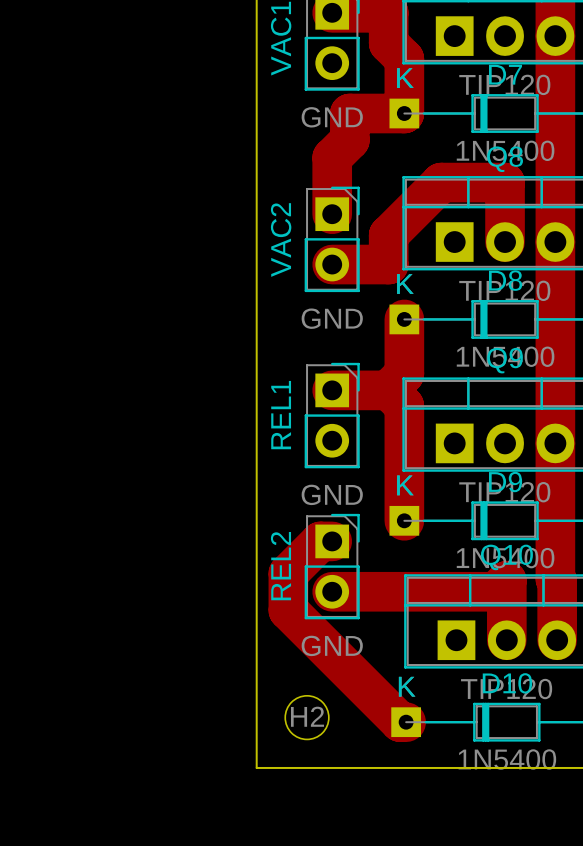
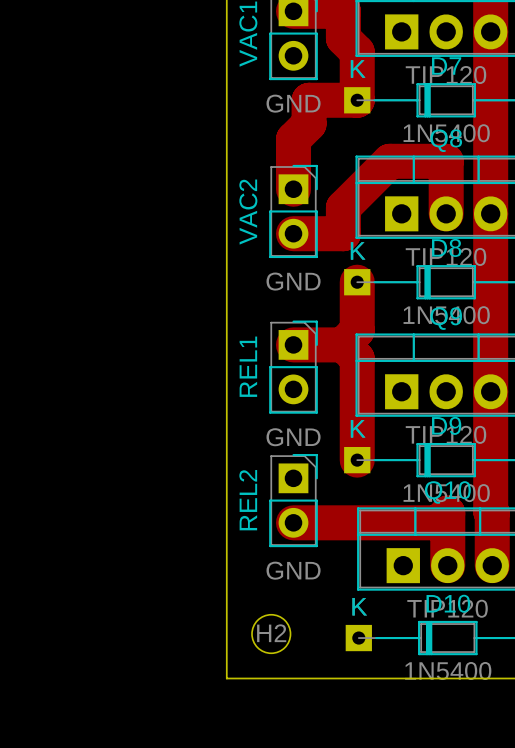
track: (332, 541) (320, 541) (288, 573) (288, 610) (400, 722) (406, 722) -> none

